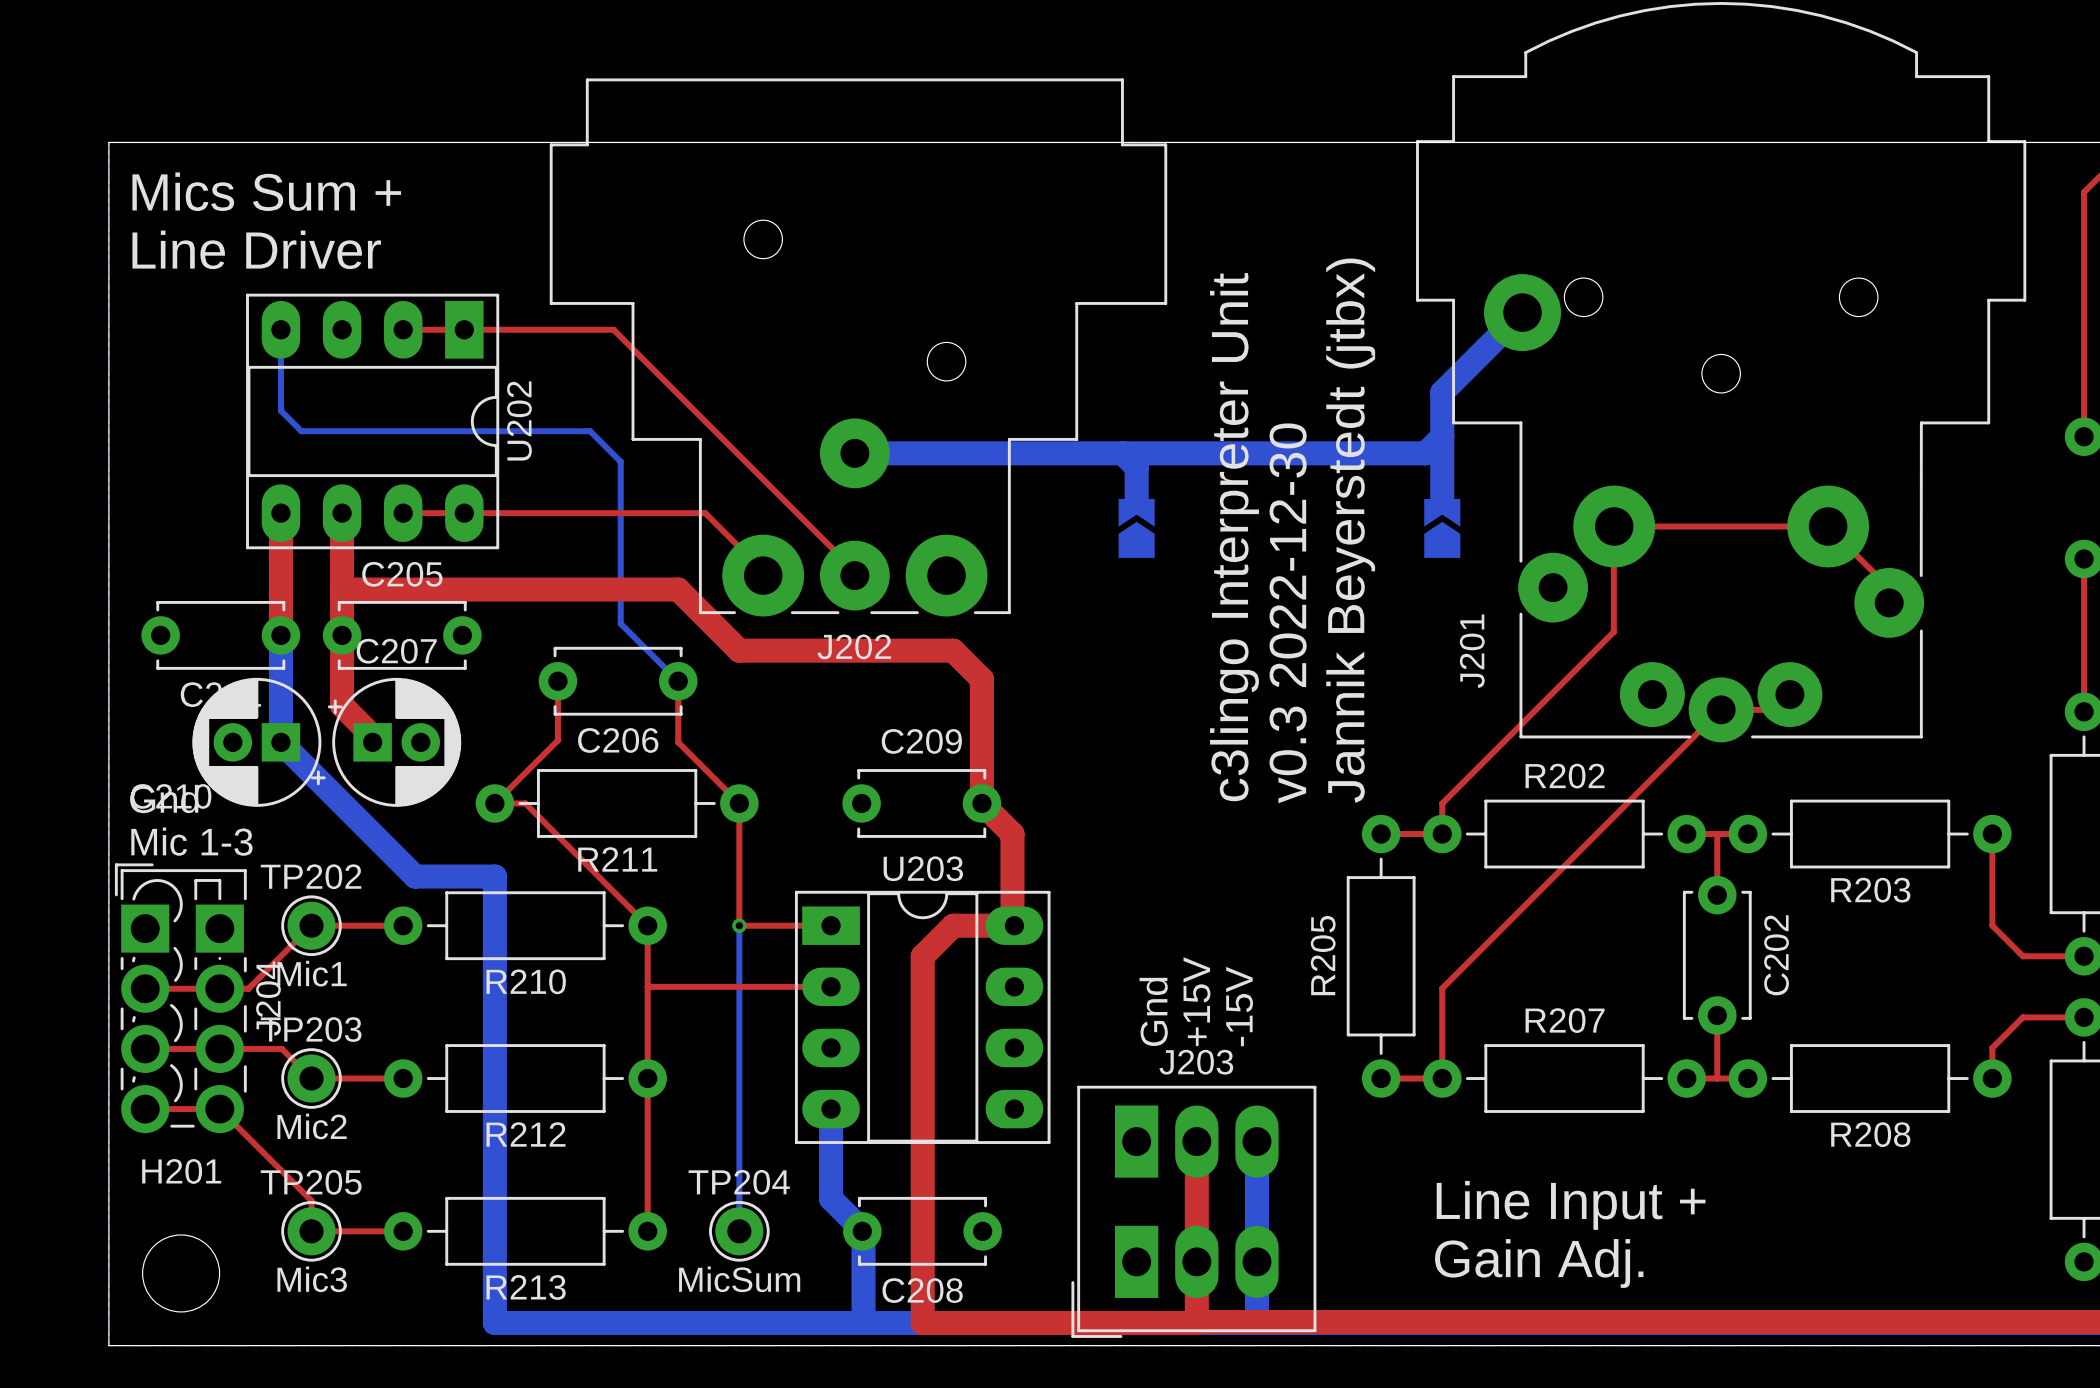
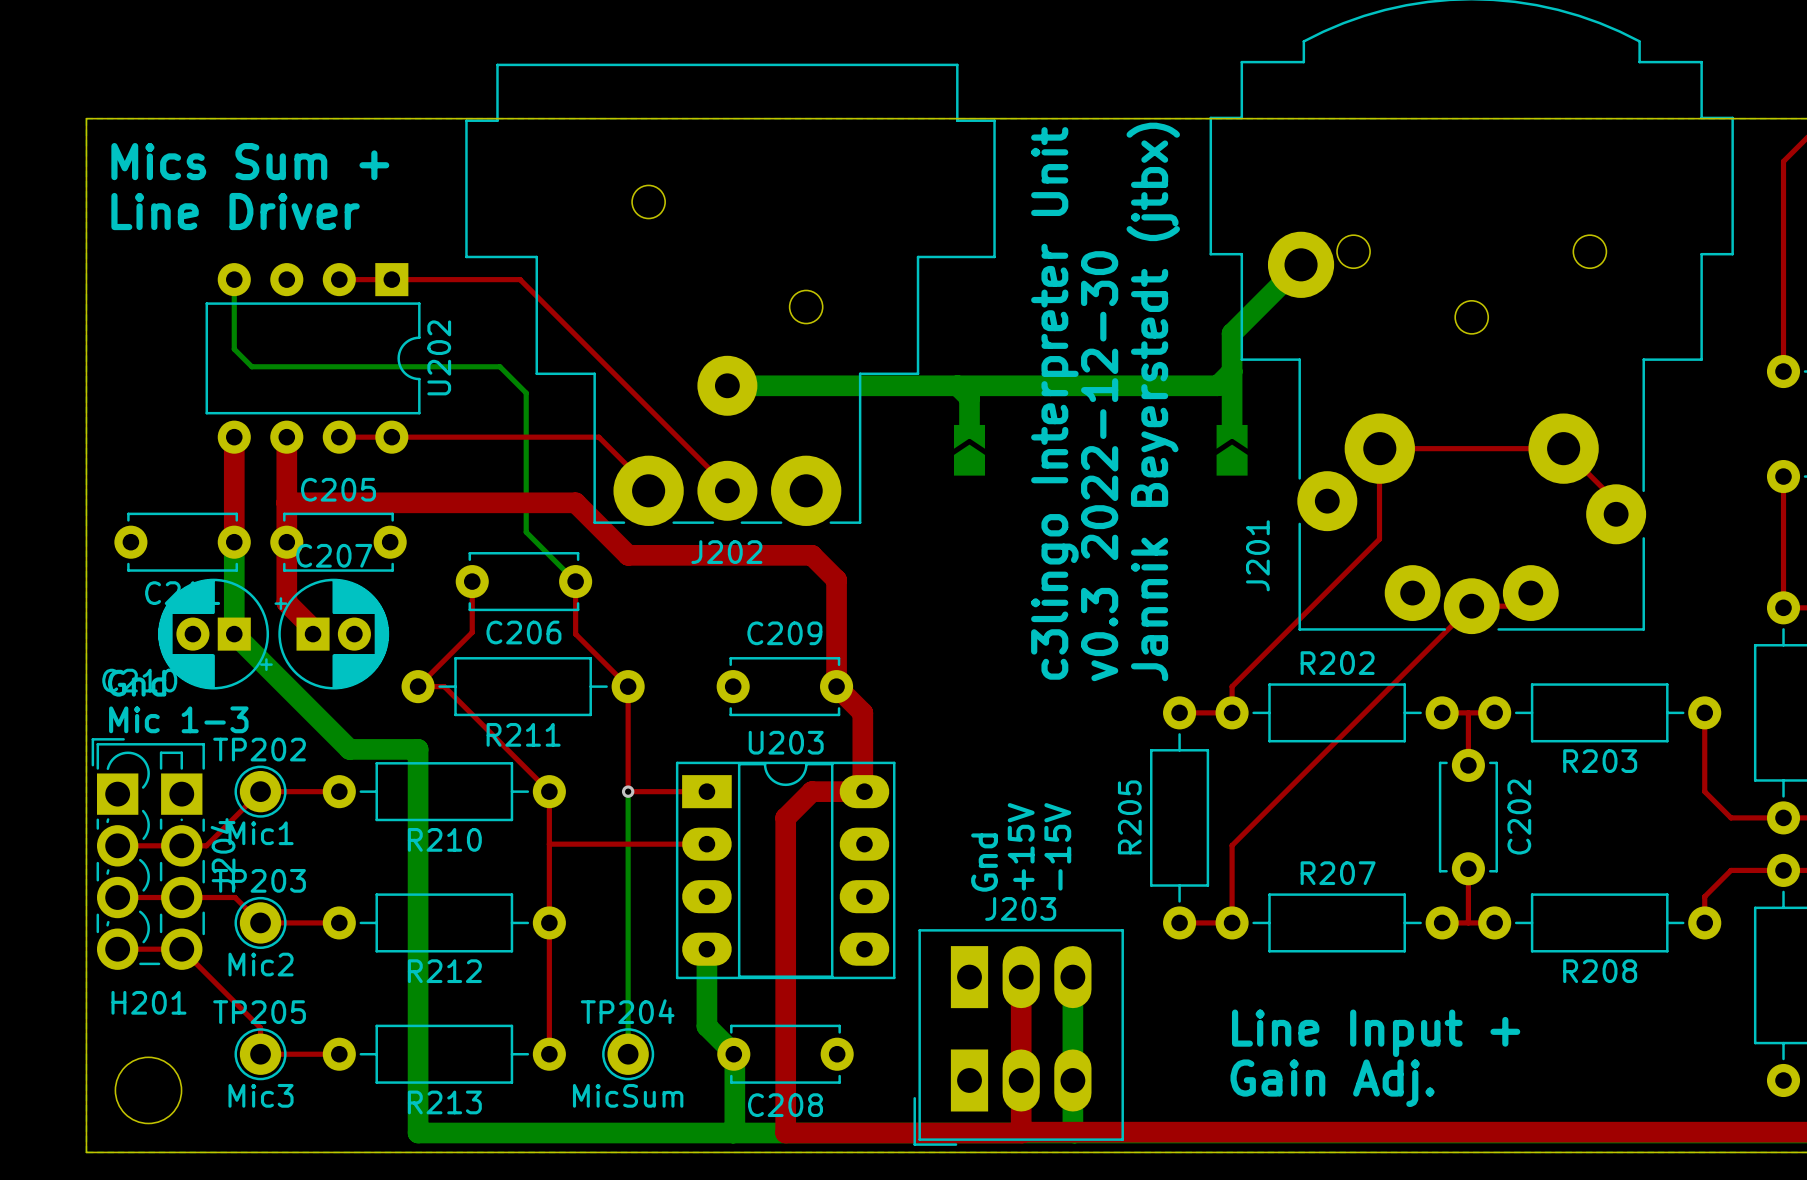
U202 footprint: [246, 293, 500, 550] -> [205, 263, 421, 454]

